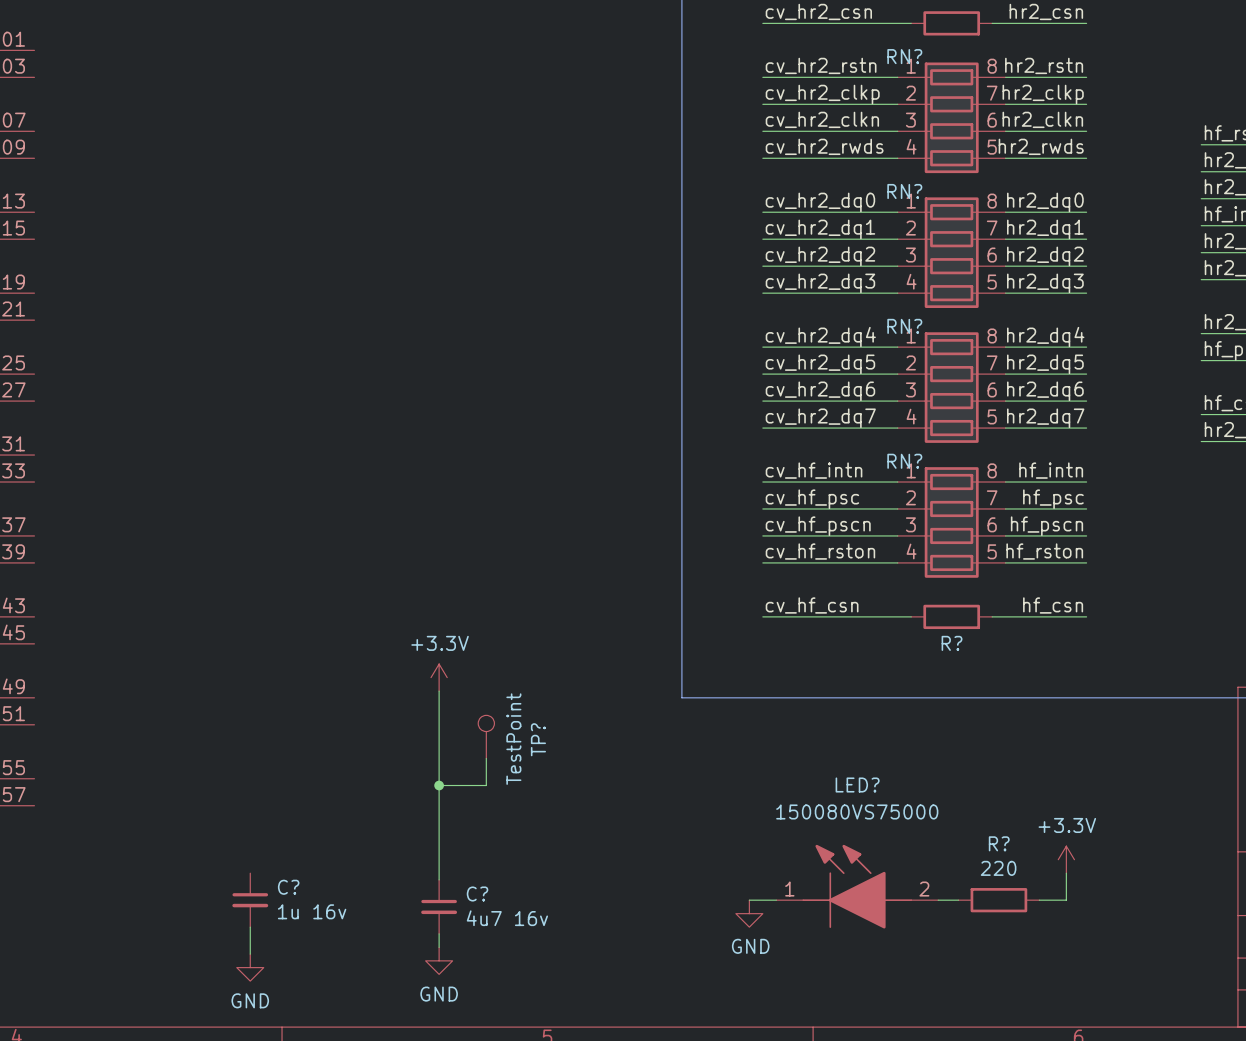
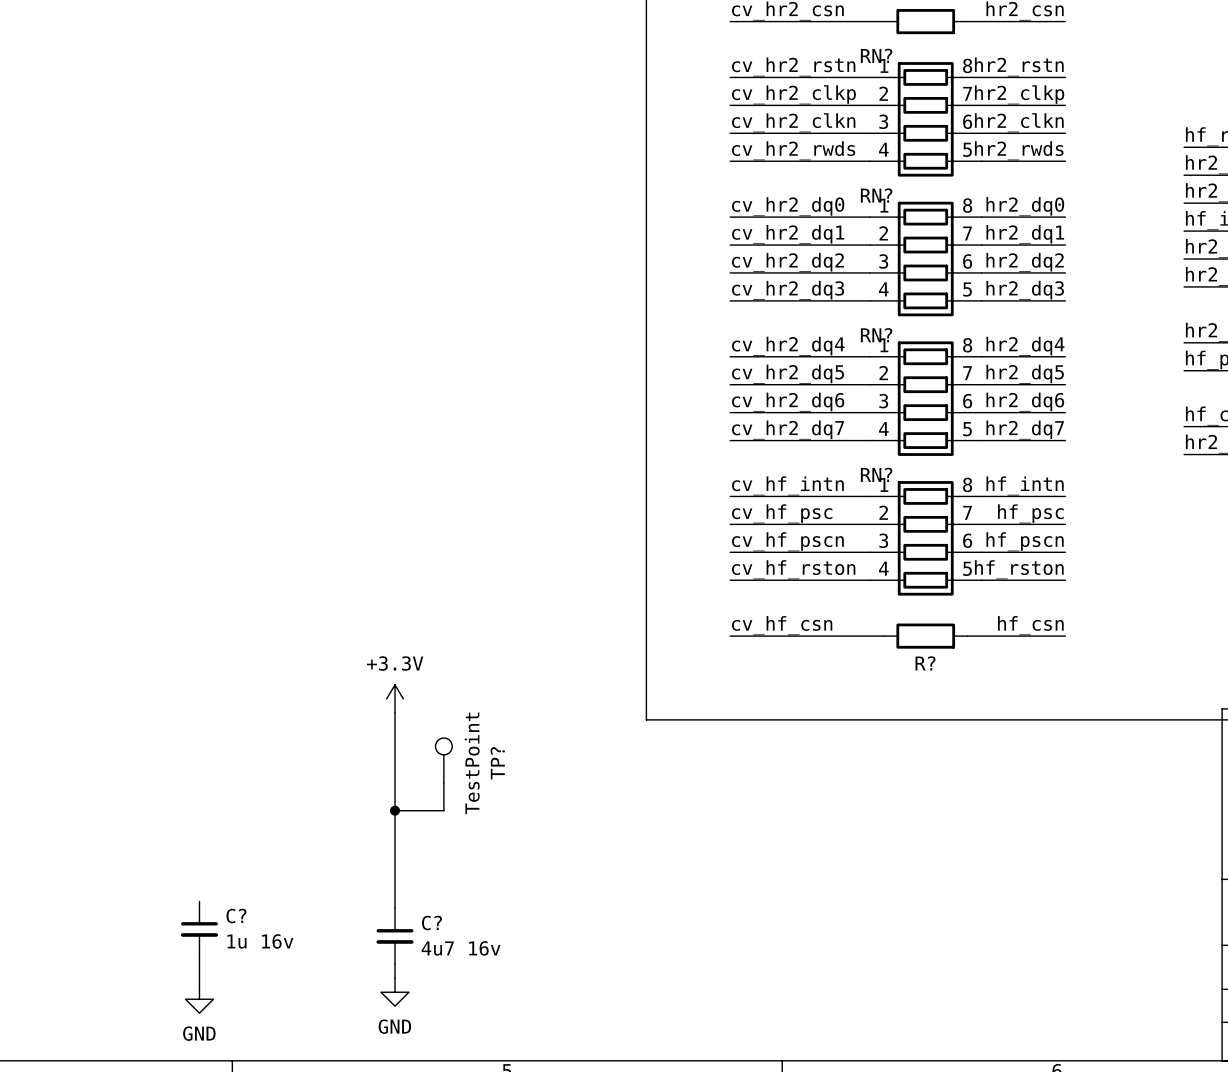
power symbol: +3.3V (1066, 859) -> none
wire: (1066, 873) (1066, 900) (1039, 900) -> none
LED?: 150080VS75000 (857, 886) -> none
wire: (749, 900) (776, 900) -> none
wire: (938, 900) (958, 900) -> none
R?: 220 (998, 900) -> none
power symbol: GND (749, 913) -> none

